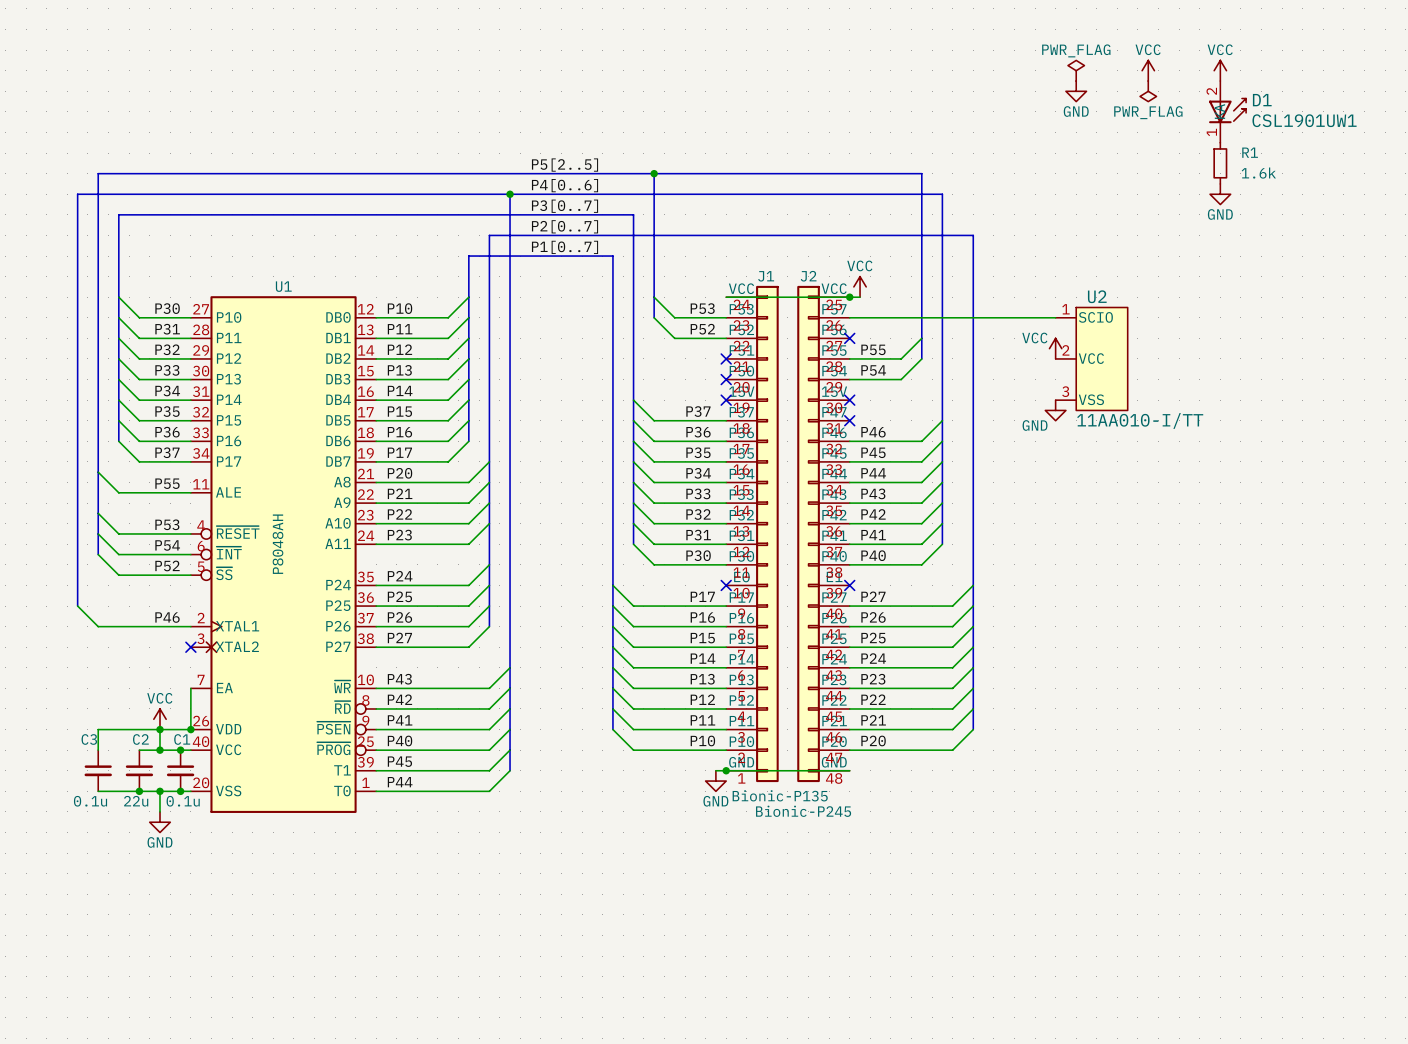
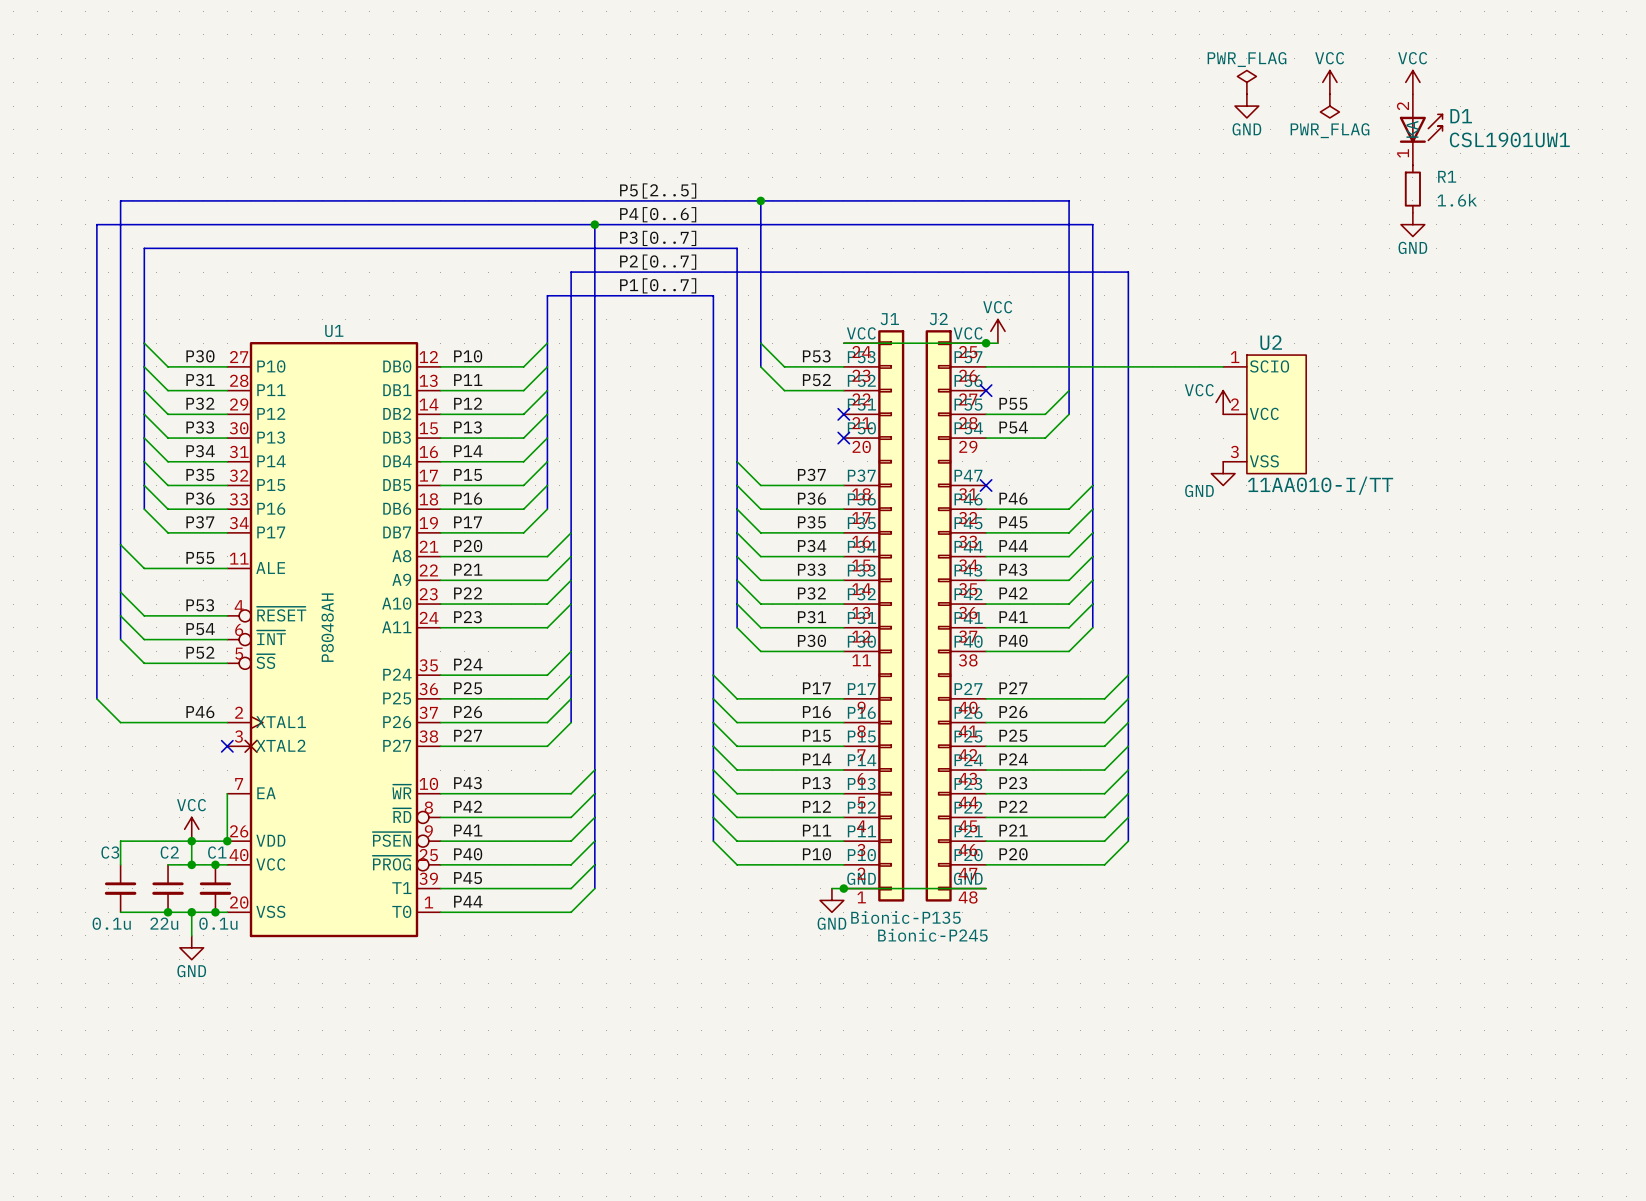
J1 symbol: [726, 285, 779, 783] -> [843, 330, 905, 902]
J2 symbol: [797, 285, 850, 783] -> [925, 330, 987, 902]
no-connect mark: (726, 400) -> none
no-connect mark: (849, 400) -> none
no-connect mark: (726, 585) -> none
no-connect mark: (849, 585) -> none

